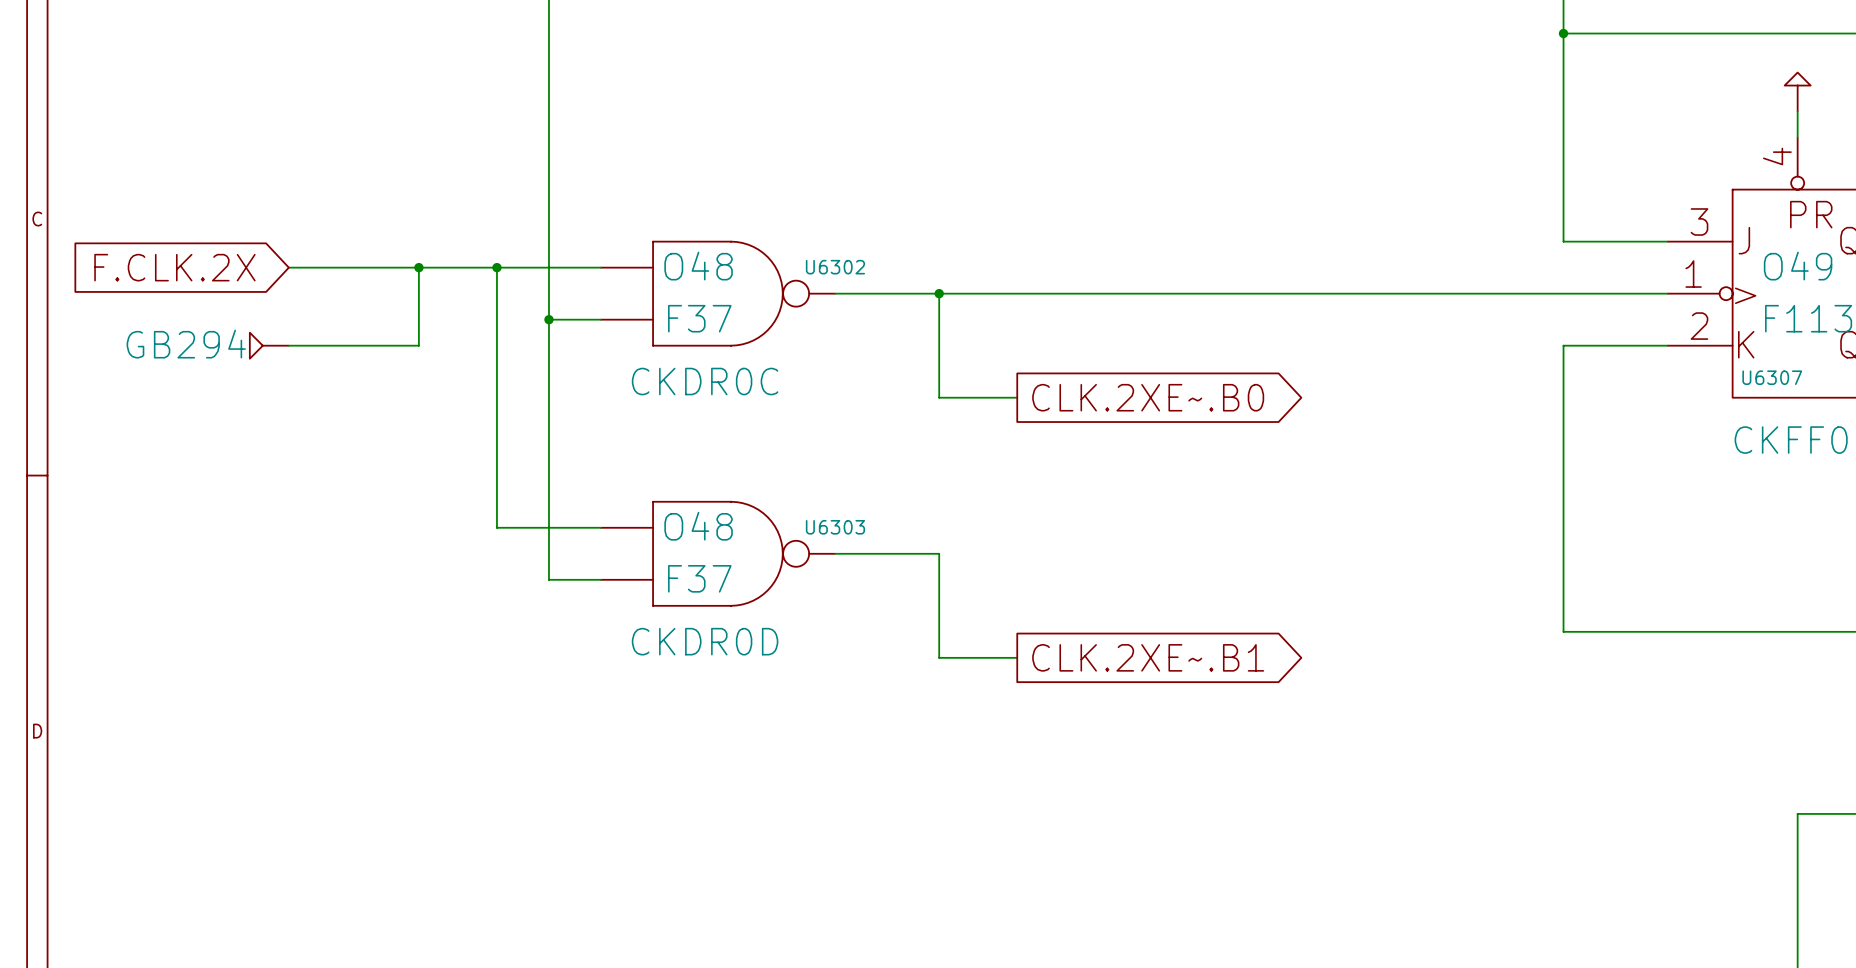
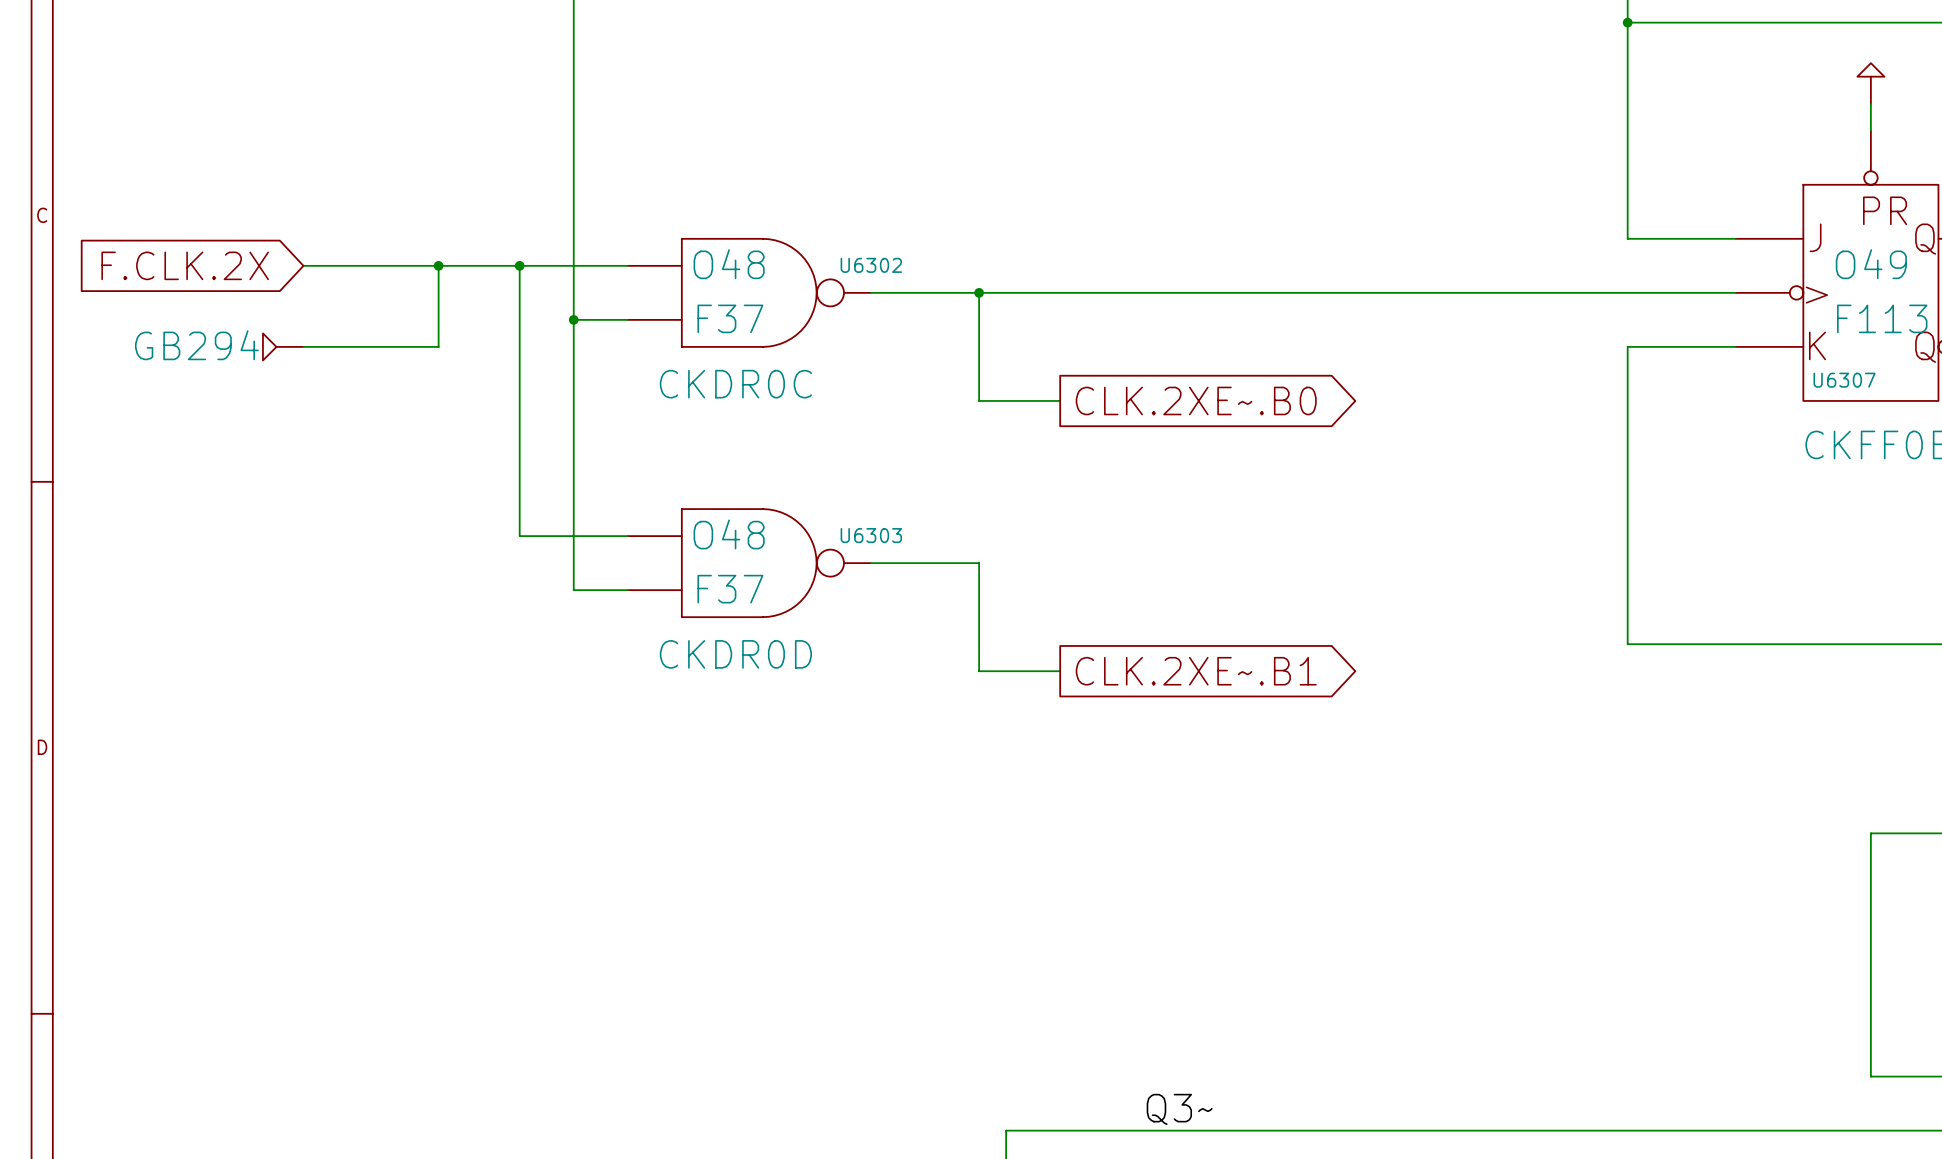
U6307 pin number: 4 (1777, 156) -> none
U6307 pin number: 3 (1699, 221) -> none
U6307 pin number: 1 (1693, 274) -> none
U6307 pin number: 2 (1699, 326) -> none

